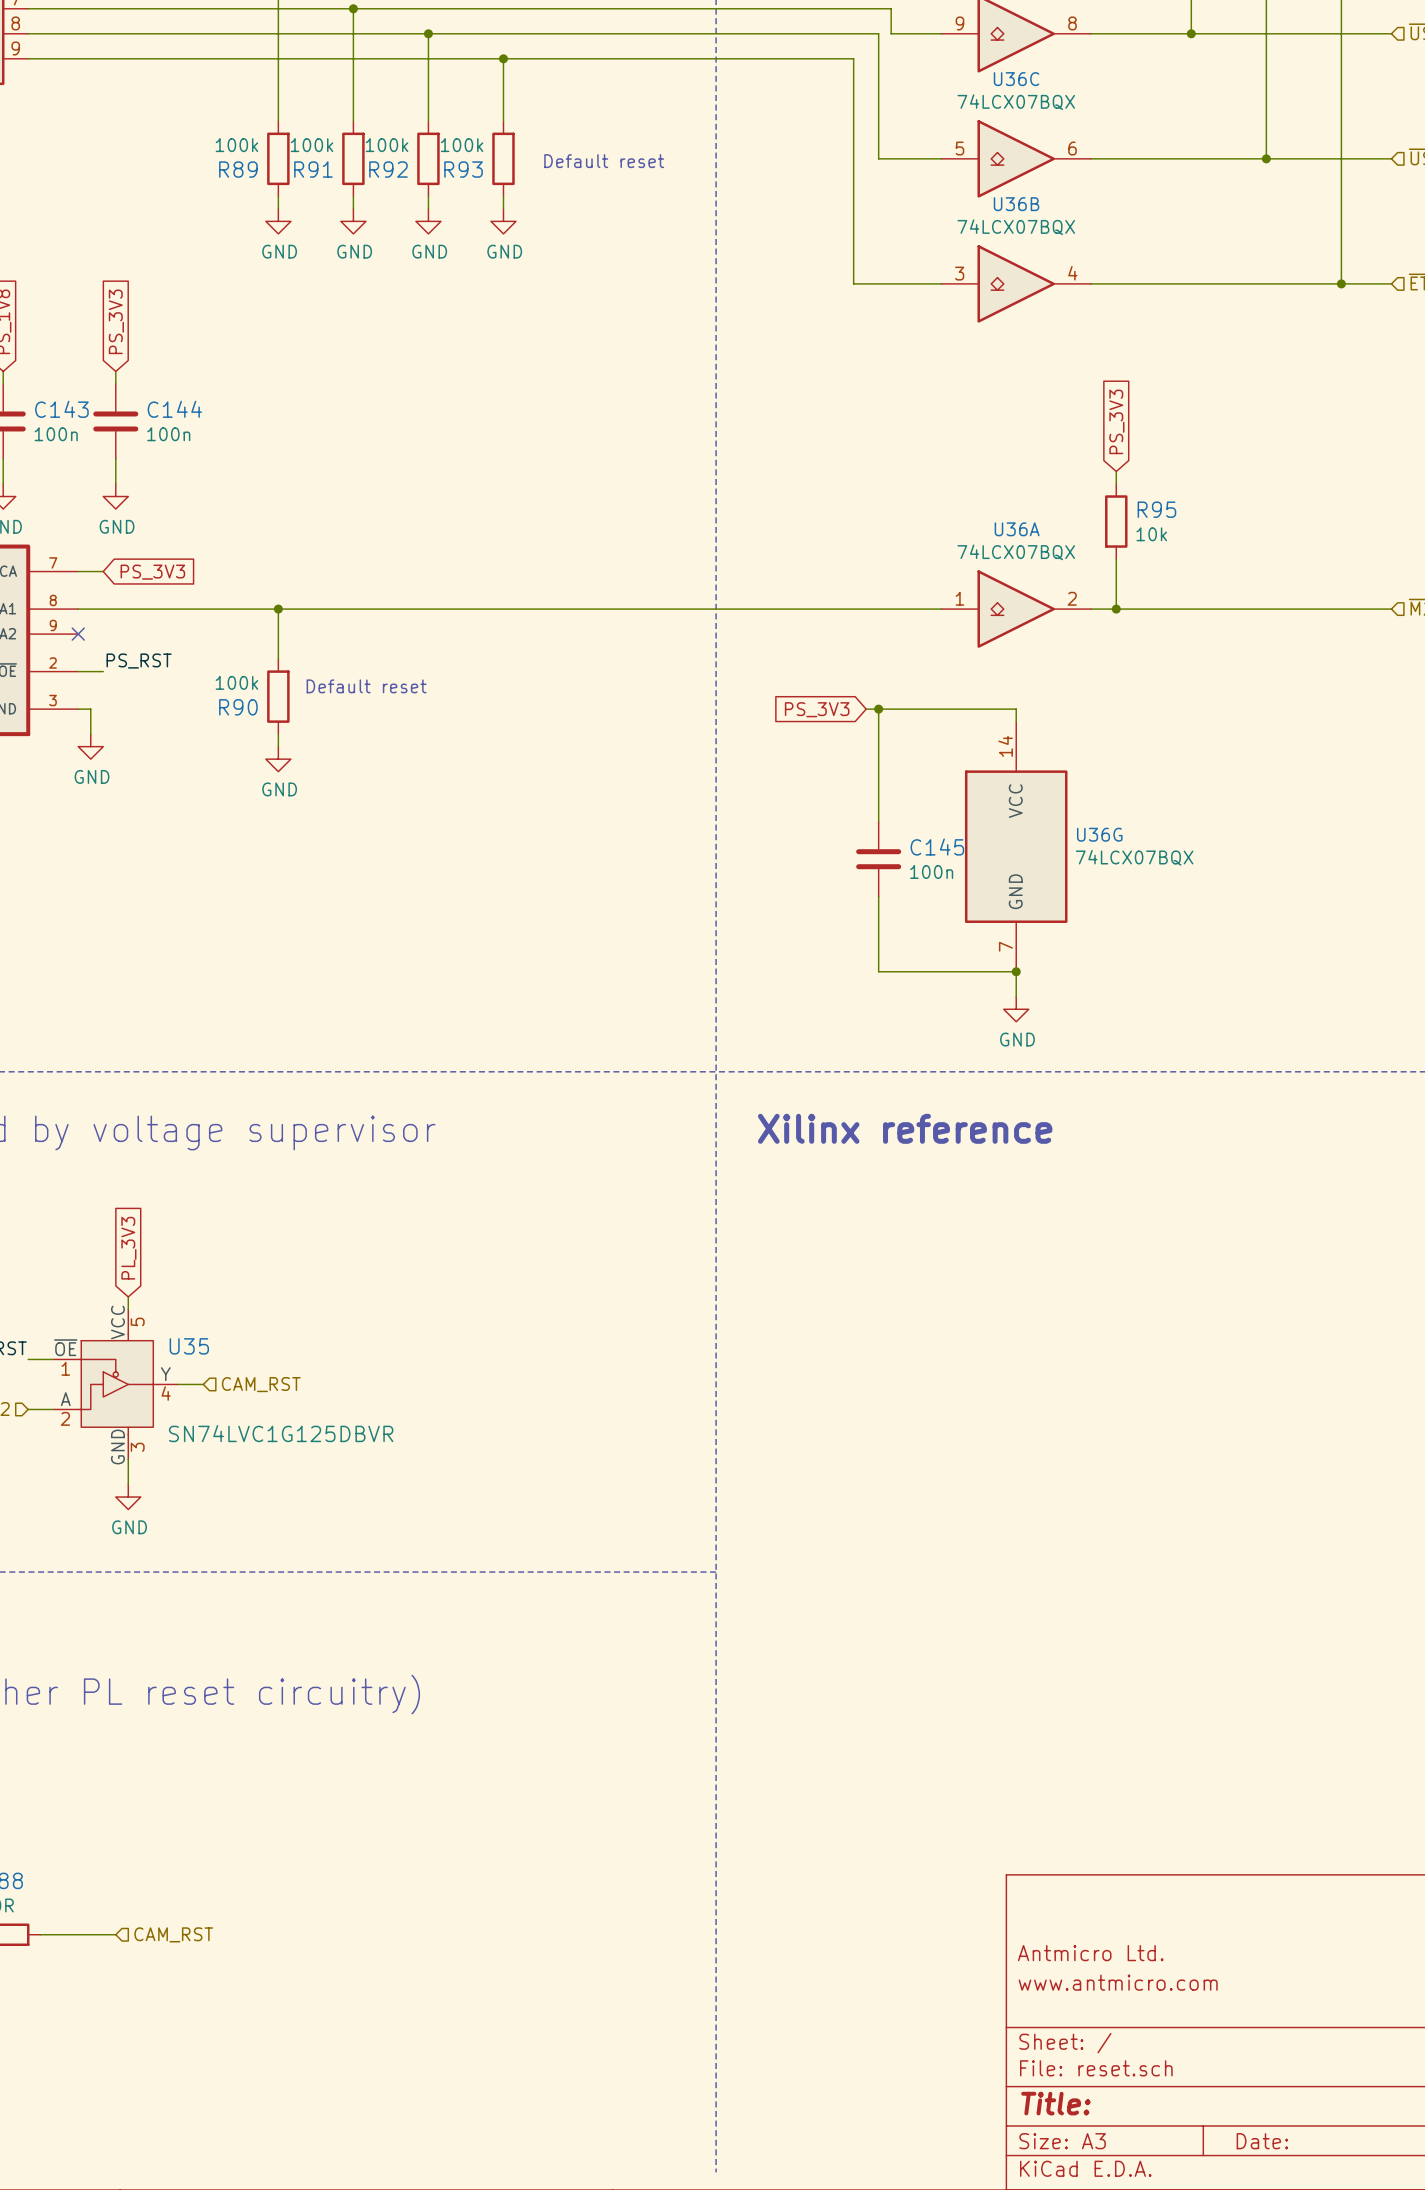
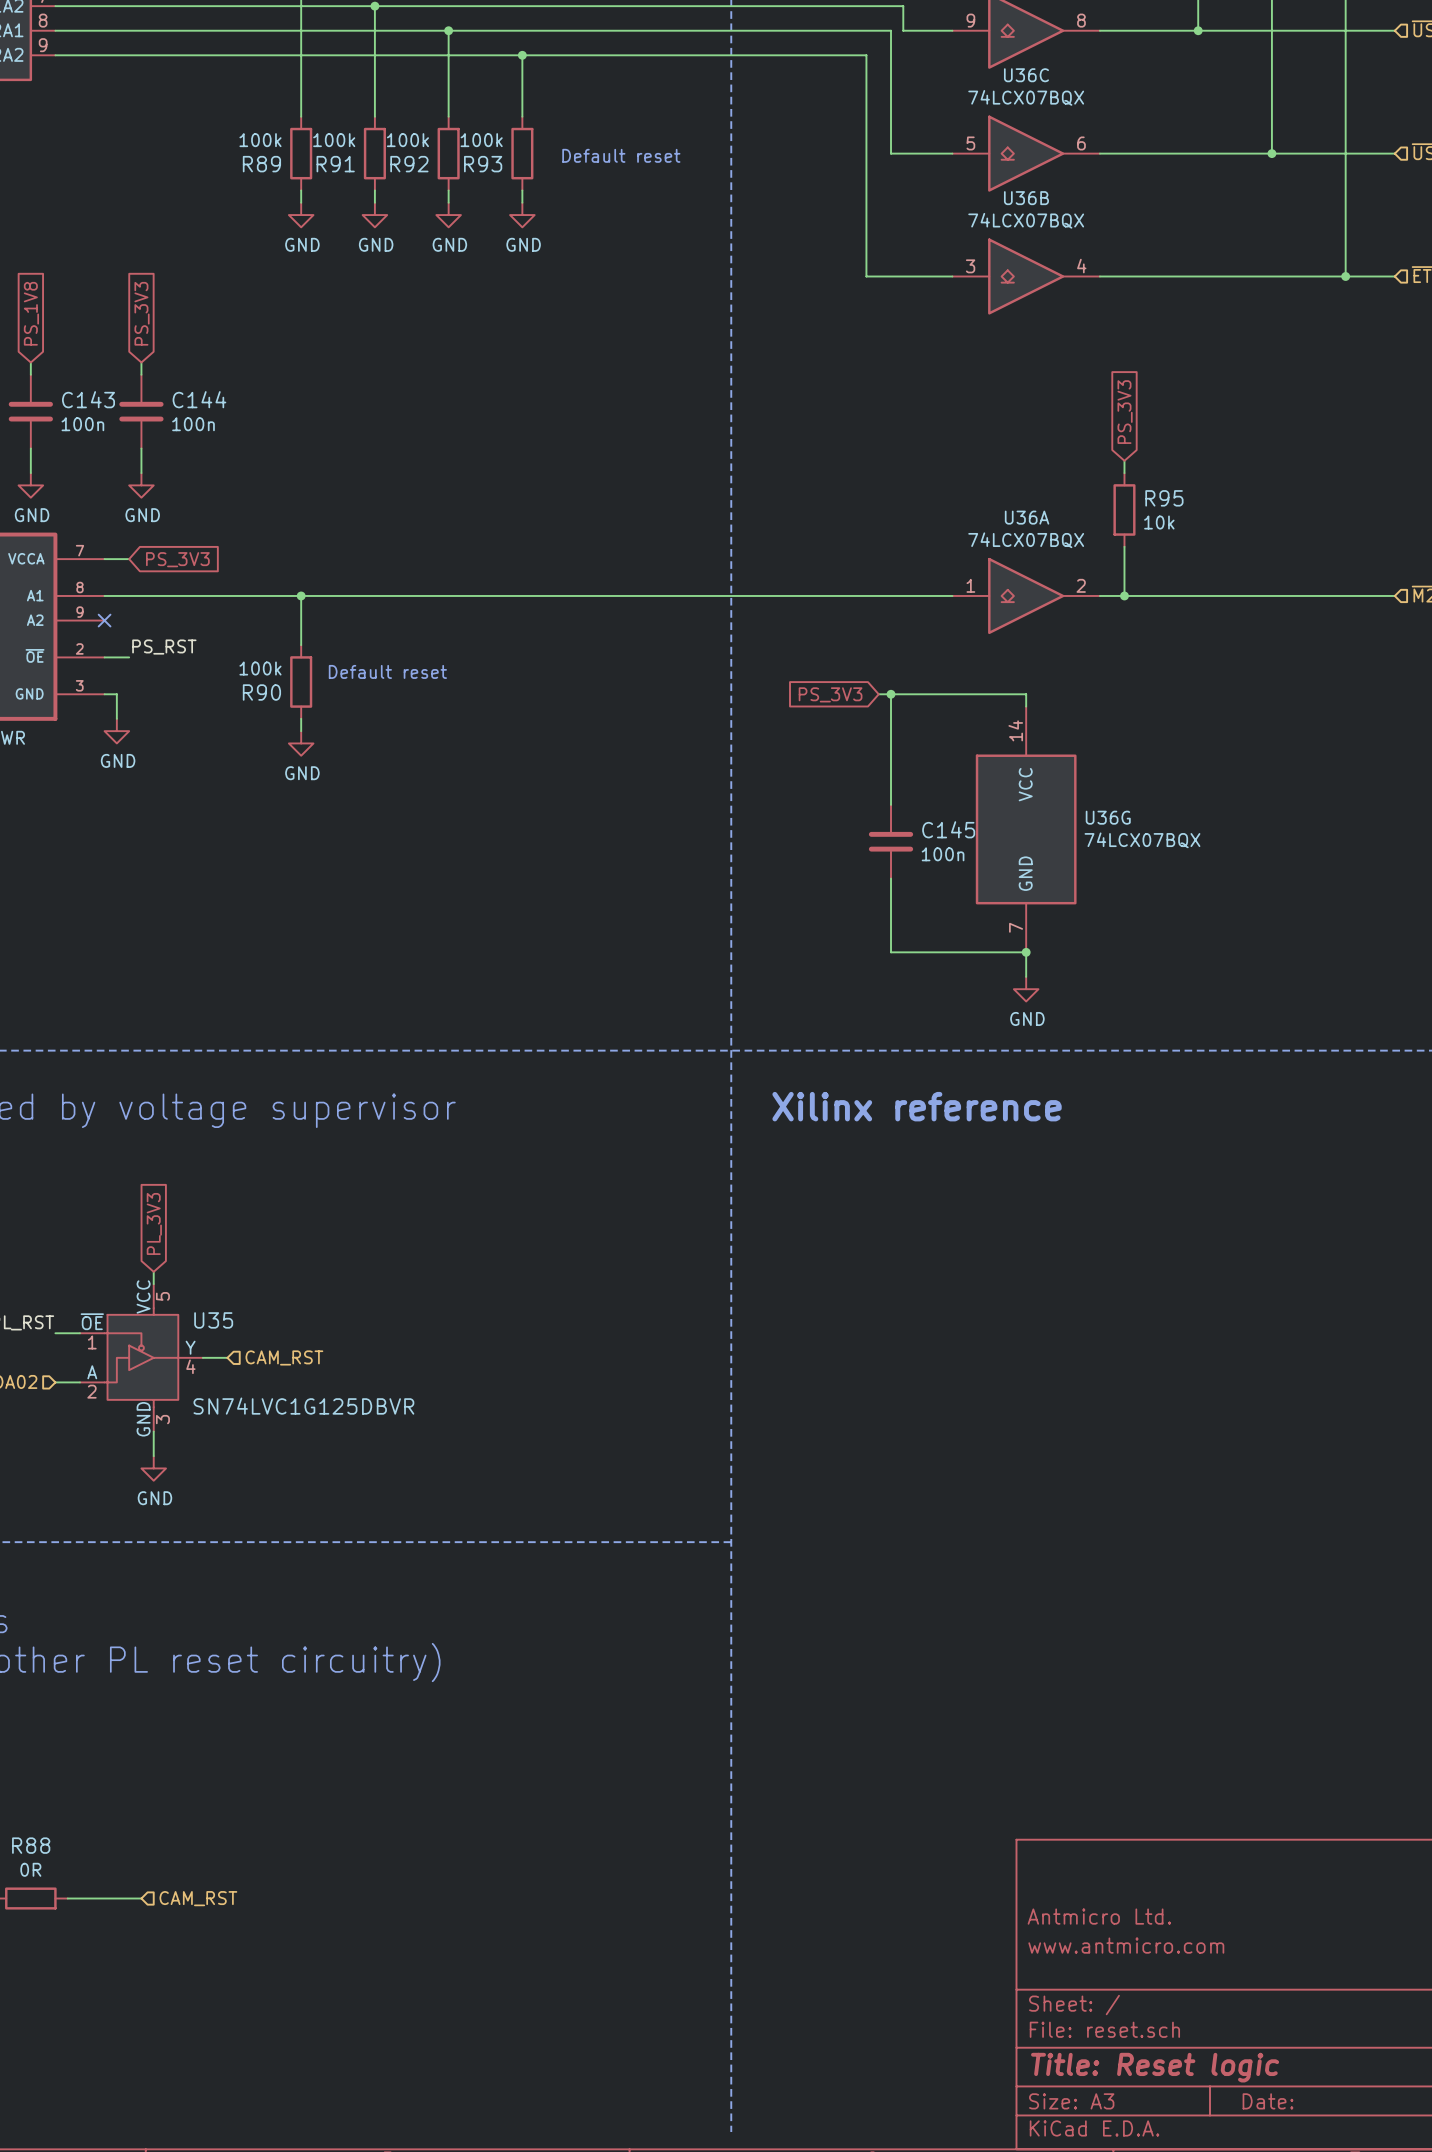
title block: Title: (1055, 2103) -> Title: Reset logic (1155, 2067)

